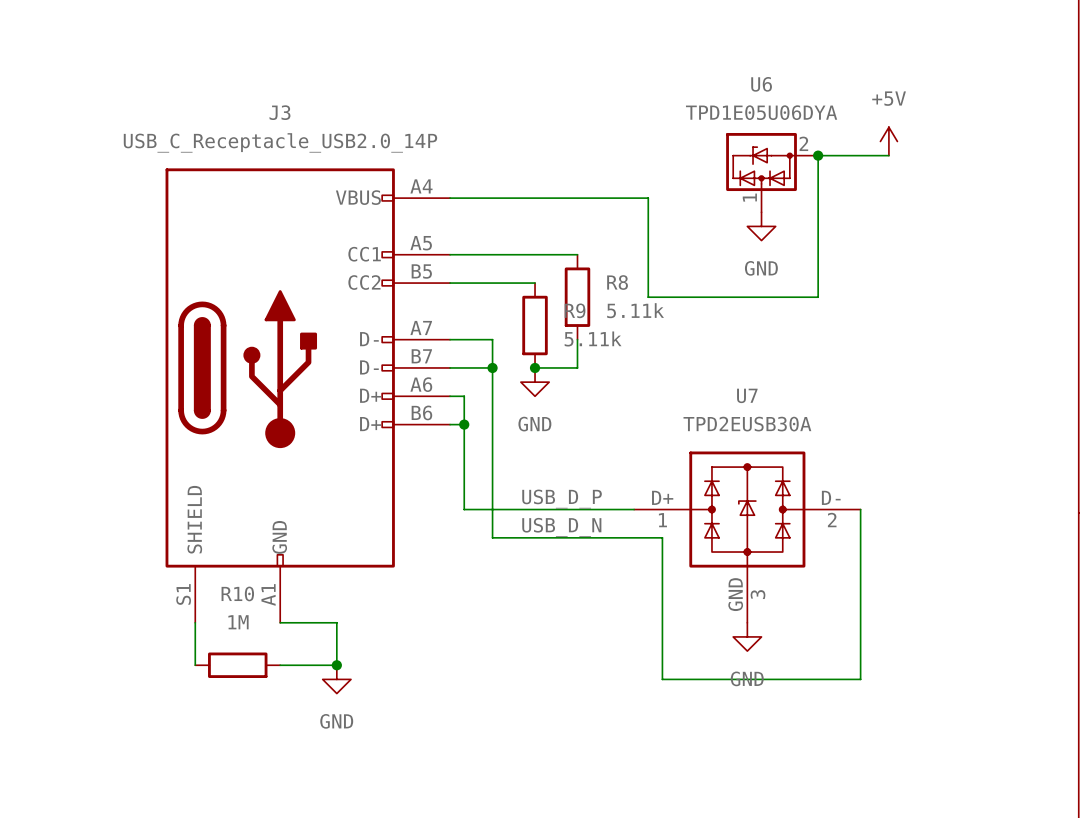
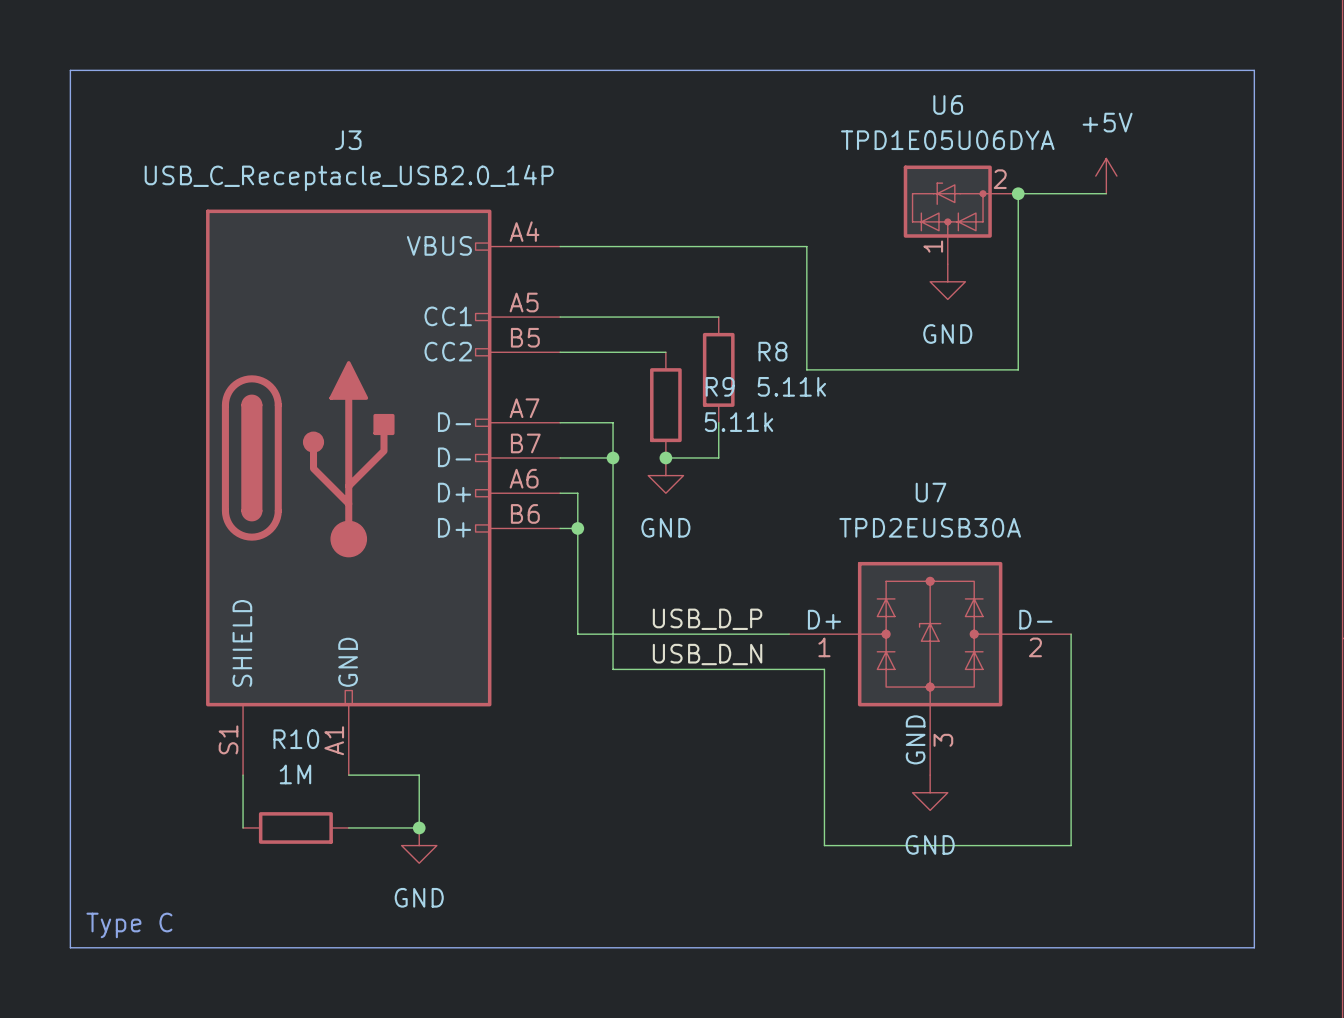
line: none -> (70, 70) (1254, 70) (1254, 947) (70, 947) (70, 70)
text: none -> Type C (129, 925)

